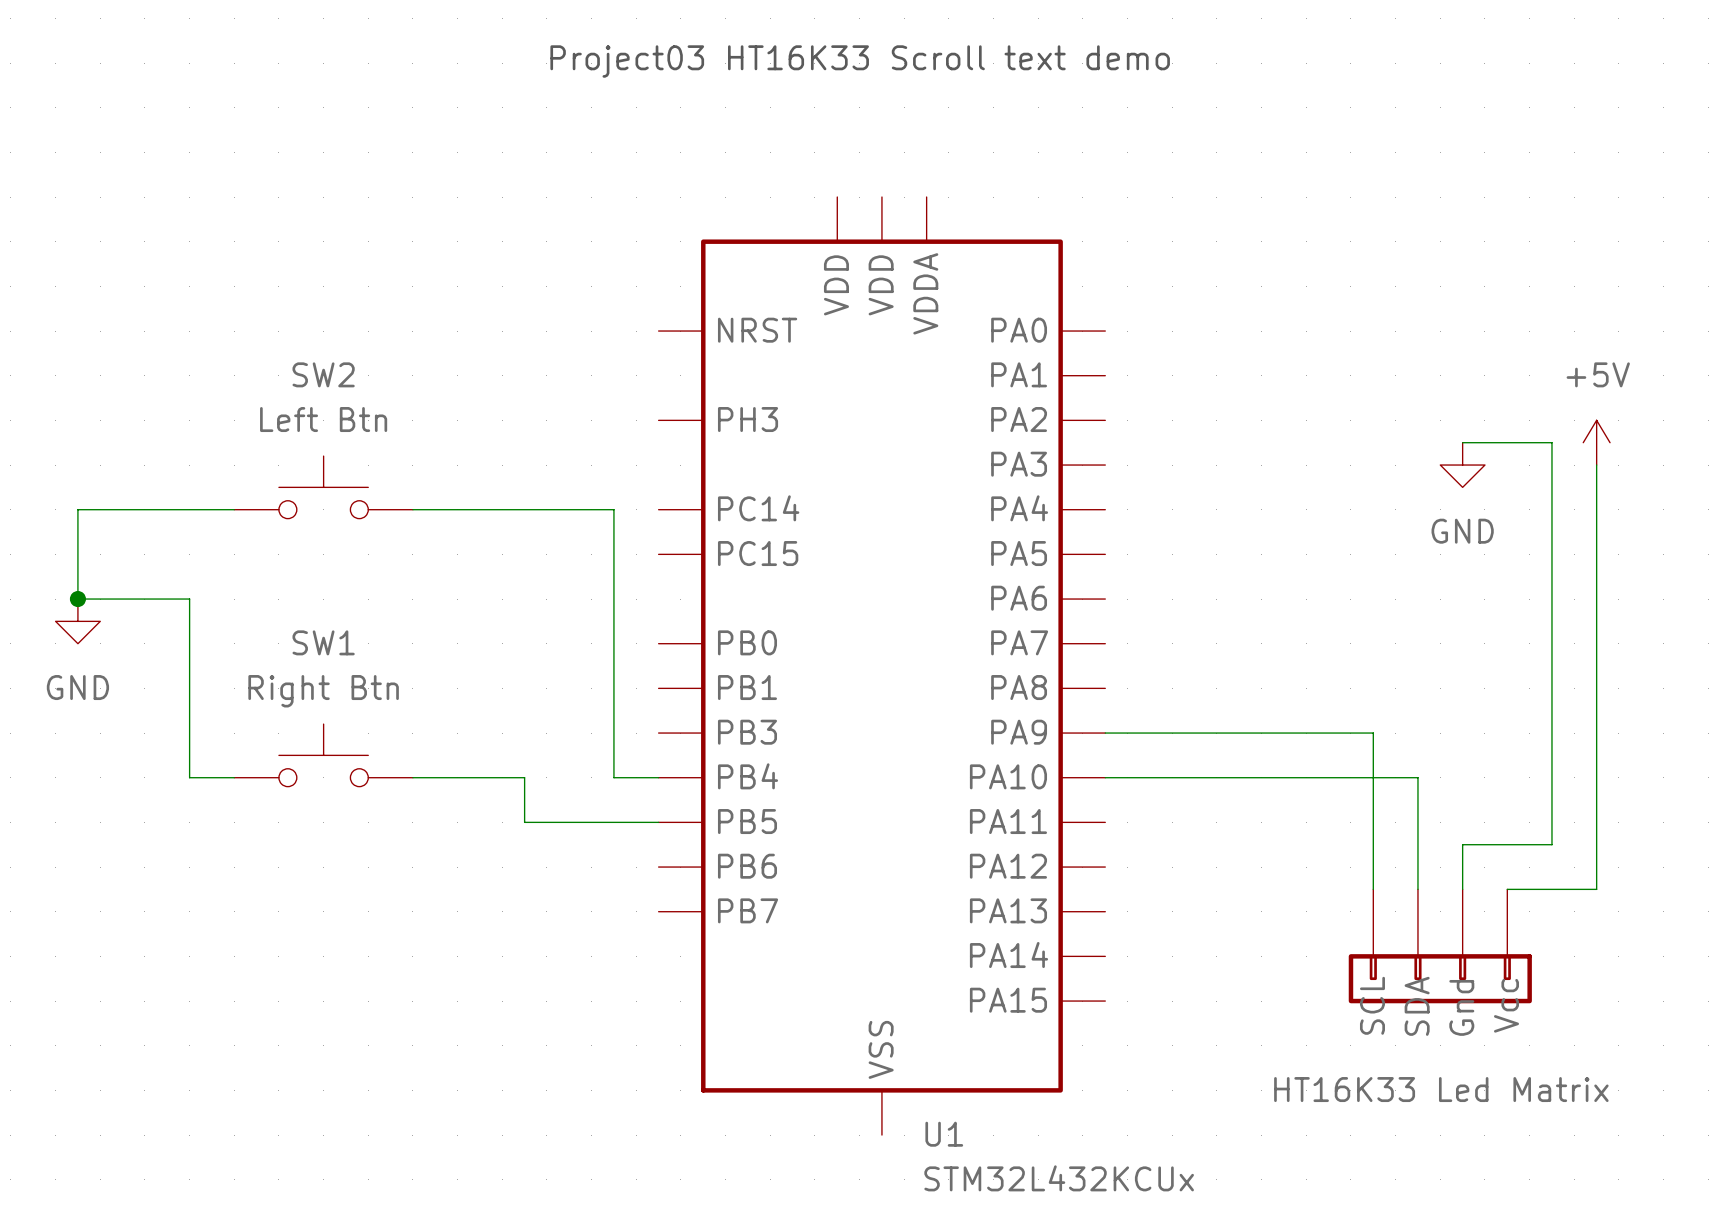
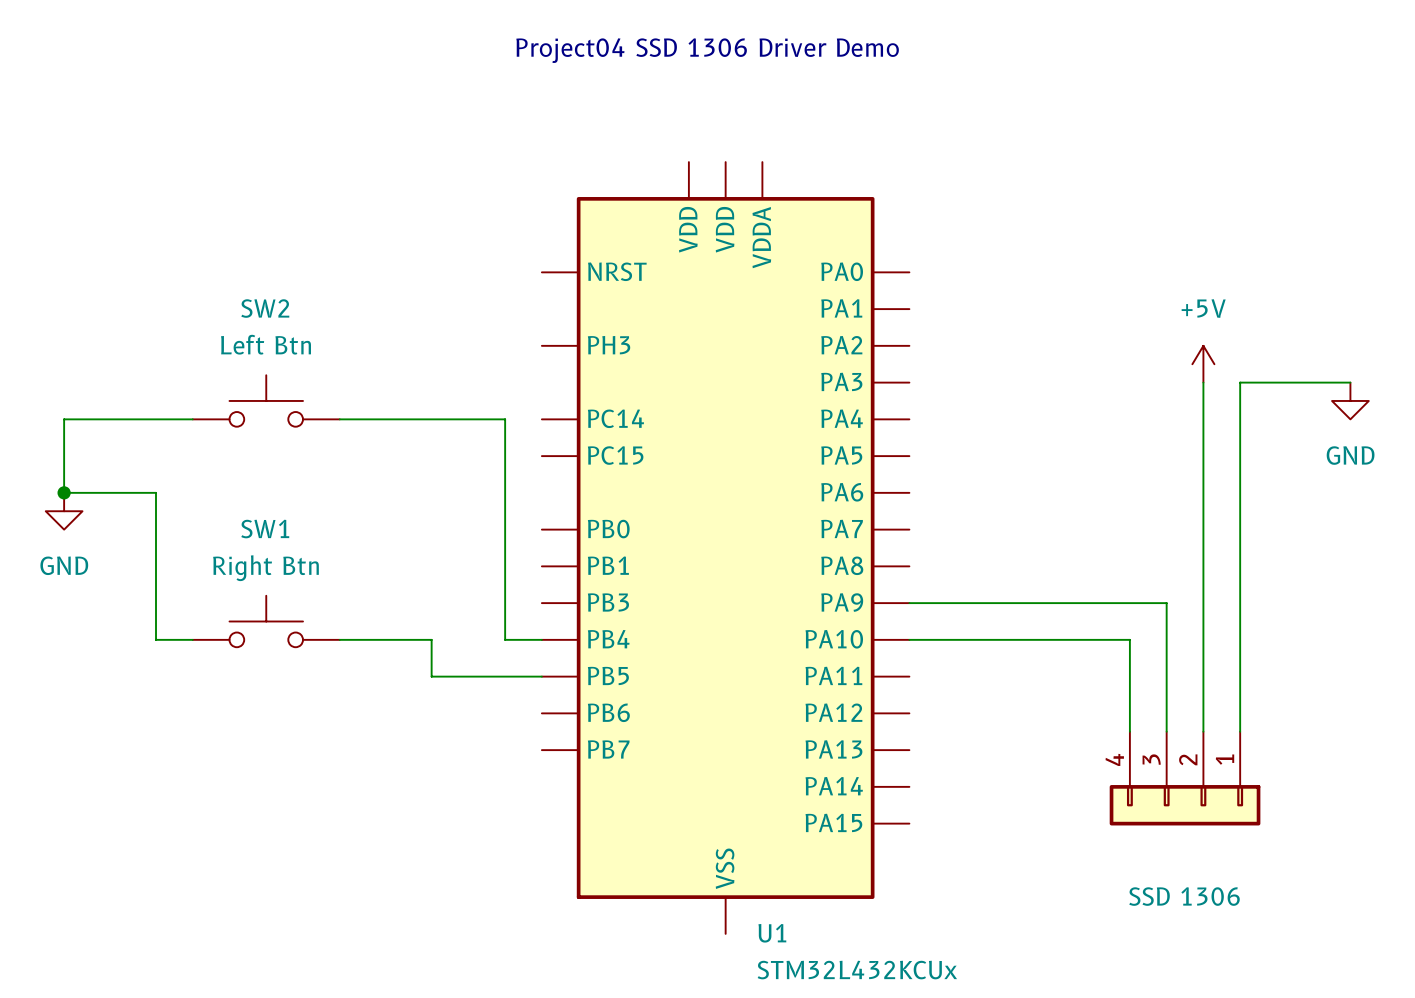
text: Project03 HT16K33 Scroll text demo (860, 61) -> Project04 SSD 1306 Driver Demo (707, 50)
wire: (1462, 442) (1551, 442) (1551, 844) (1462, 844) -> (1203, 382) (1203, 694)
power symbol position: +5V (1596, 442) -> +5V (1203, 364)
power symbol position: GND (1462, 465) -> GND (1350, 400)
wire: (1596, 465) (1596, 889) (1507, 889) -> (1350, 382) (1240, 382) (1240, 731)
wire: (1373, 733) (1373, 777) (1417, 777) -> (1129, 603) (1166, 603) (1166, 639)
part pin number: none -> 4 (1114, 759)
part pin number: none -> 1 (1225, 759)
part pin number: none -> 3 (1151, 759)
part pin number: none -> 2 (1188, 759)
part pin name: SCL (1372, 1005) -> none
part pin name: Vcc (1506, 1005) -> none
part pin name: SDA (1417, 1006) -> none
part pin name: Gnd (1461, 1007) -> none
part value: HT16K33 Led Matrix (1441, 1089) -> SSD 1306 (1184, 896)

